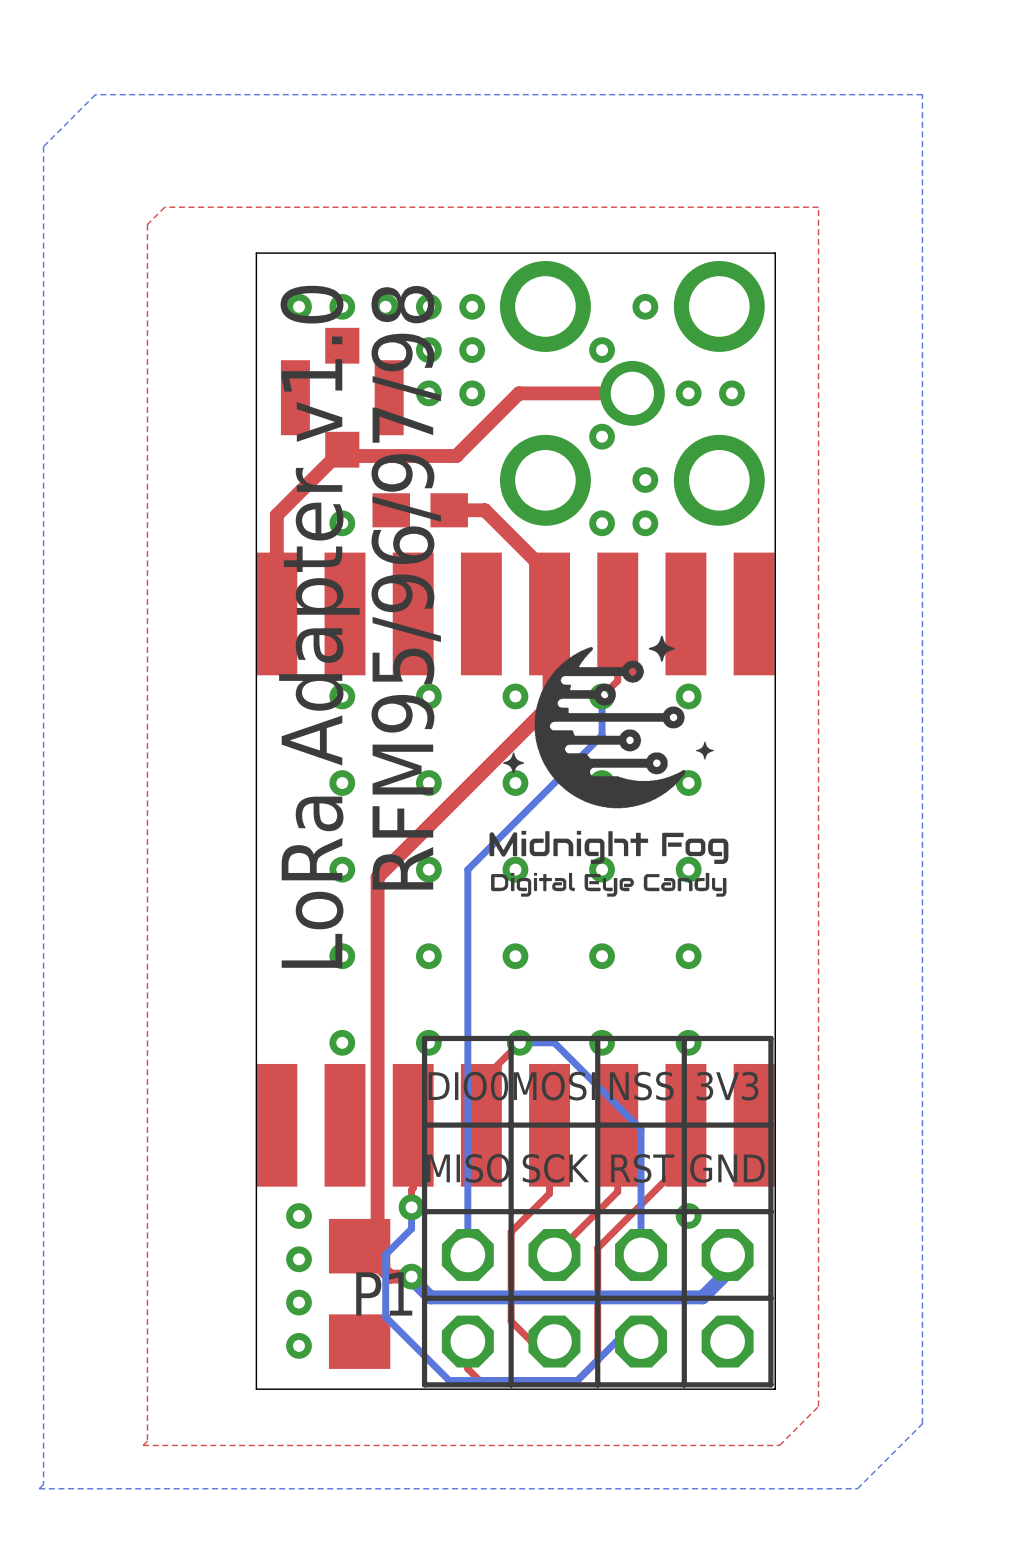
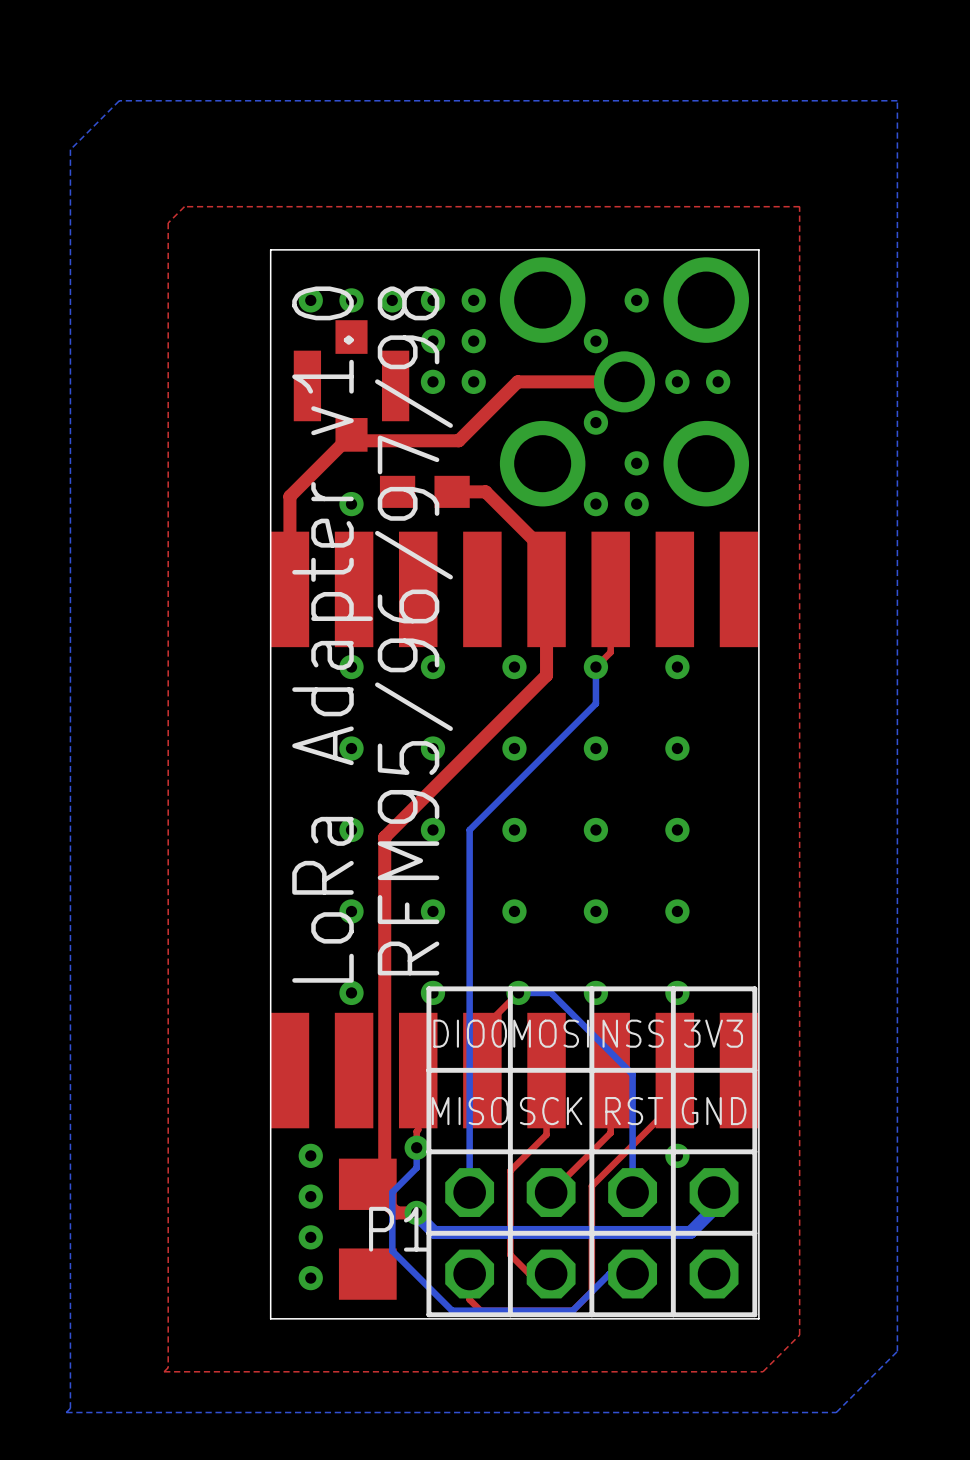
drawing: [489, 635, 729, 897] -> none

